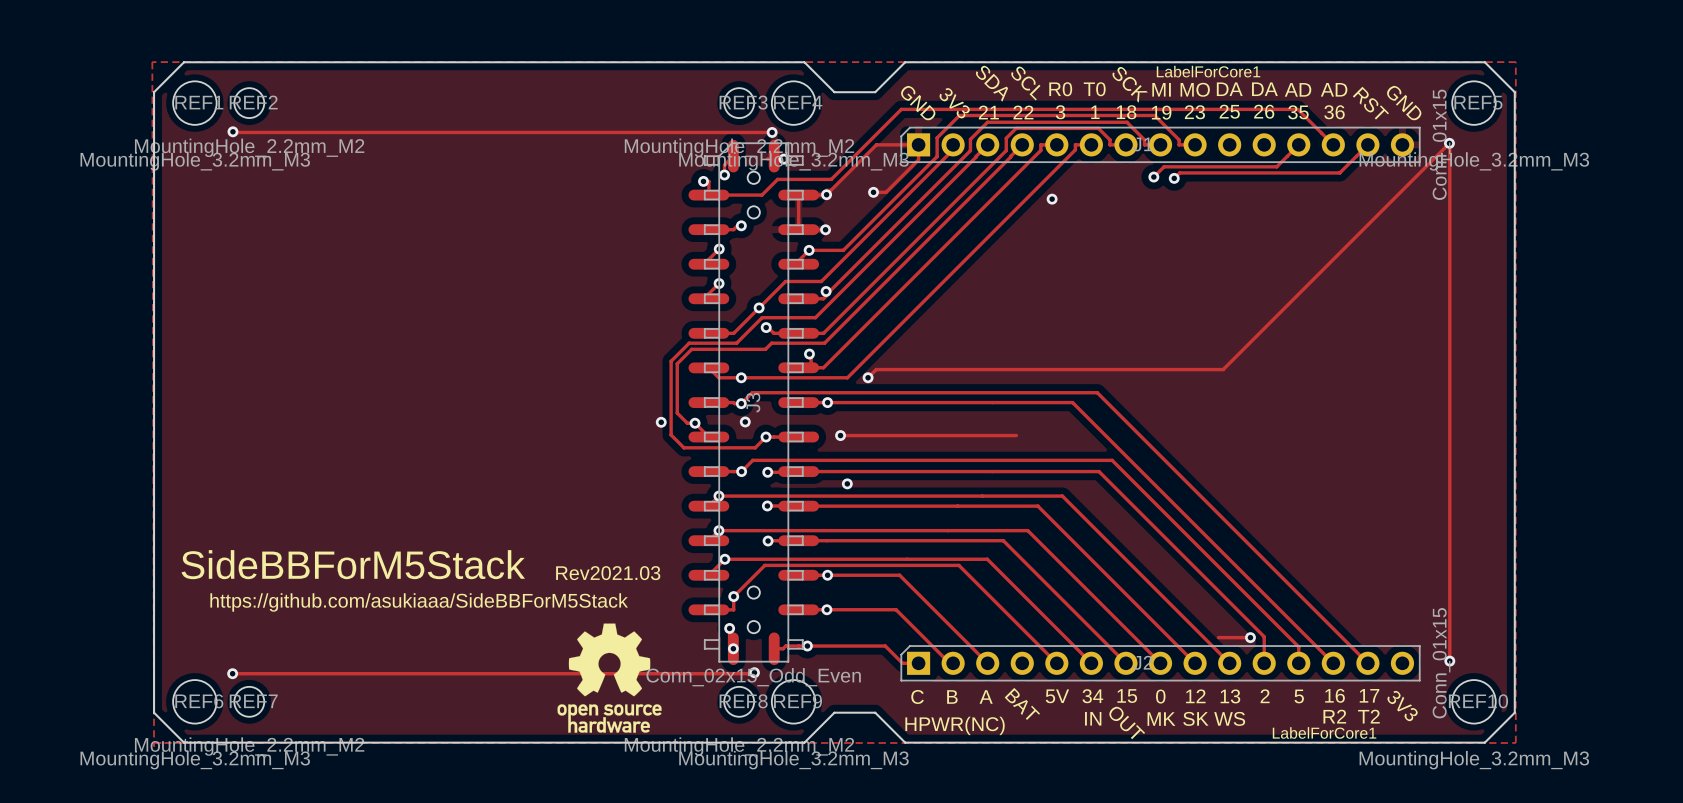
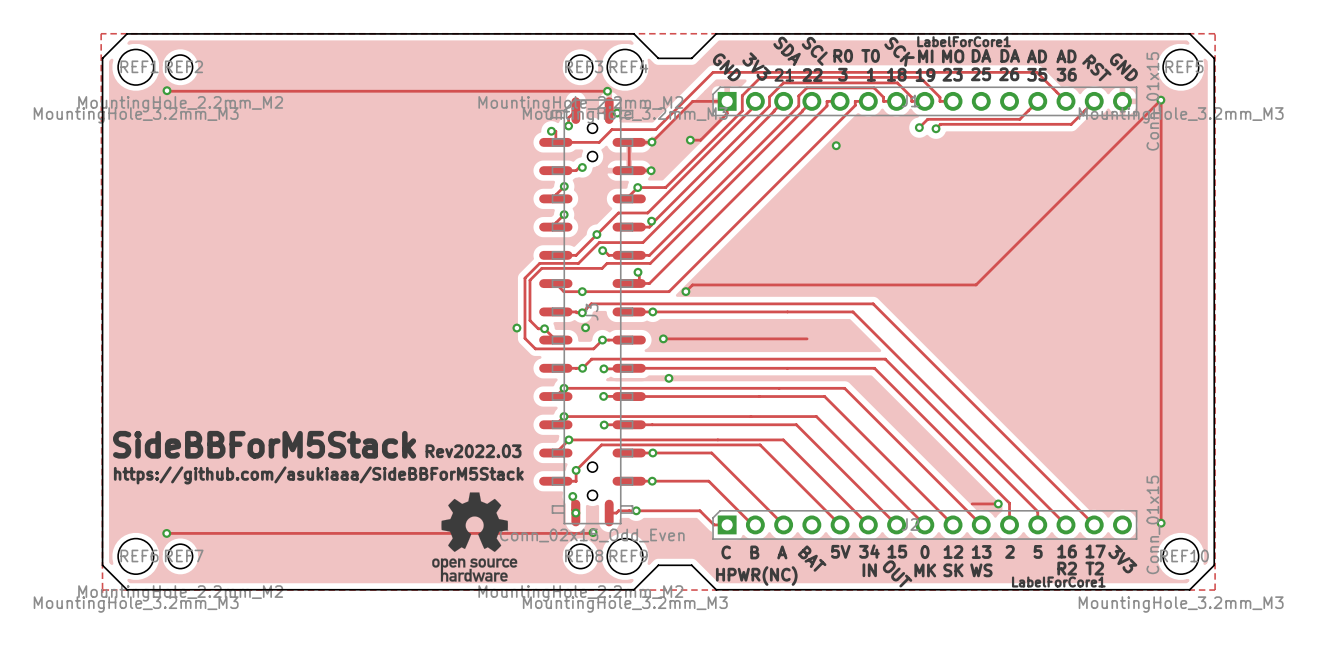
text: Rev2021.03 (608, 573) -> Rev2022.03 (473, 451)

